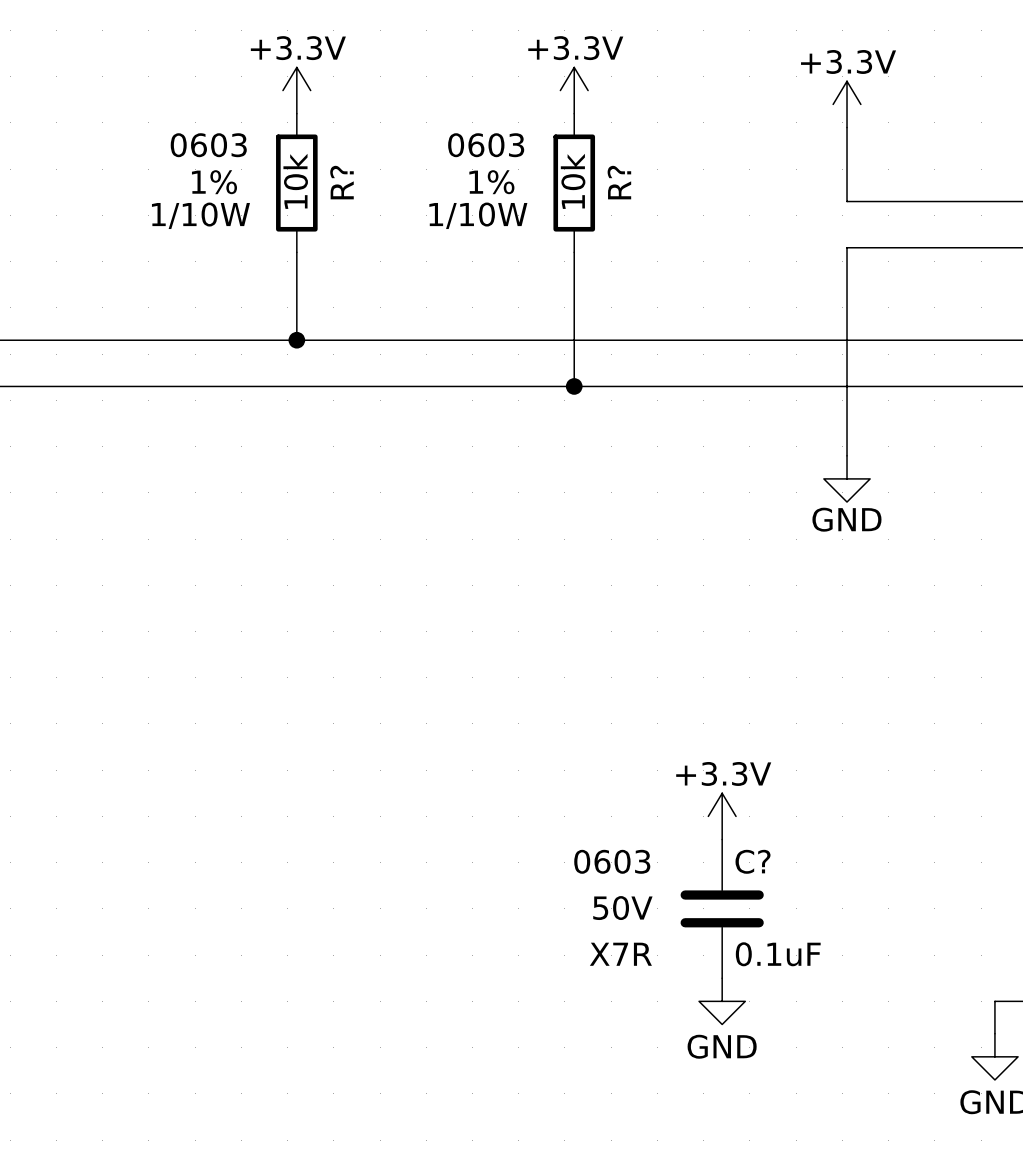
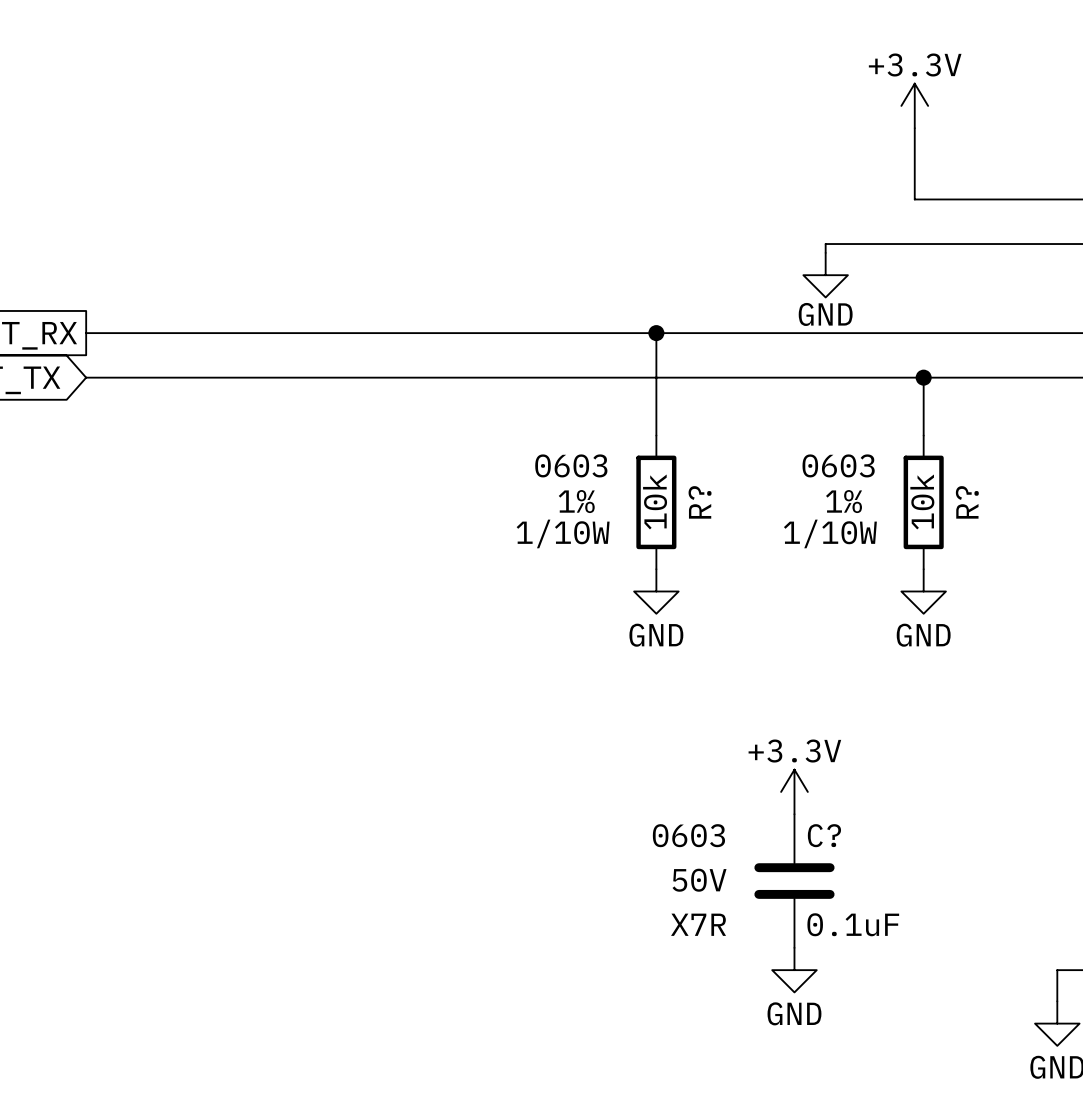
power symbol: +3.3V (296, 90) -> none
power symbol: +3.3V (574, 90) -> none
R?: 10k (296, 183) -> none
R?: 10k (574, 183) -> none
wire: (847, 247) (847, 455) -> (914, 244) (825, 244) (825, 252)
wire: (296, 252) (296, 340) -> none
wire: (574, 252) (574, 386) -> none
power symbol: none -> GND (825, 275)
junction: (296, 340) -> none
wire: none -> (656, 333) (656, 435)
junction position: (574, 386) -> (656, 333)
wire: none -> (923, 377) (923, 435)
junction: none -> (923, 377)
power symbol: GND (847, 478) -> none
R?: none -> 10k (656, 502)
R?: none -> 10k (923, 502)
power symbol: none -> GND (656, 591)
power symbol: none -> GND (923, 591)

